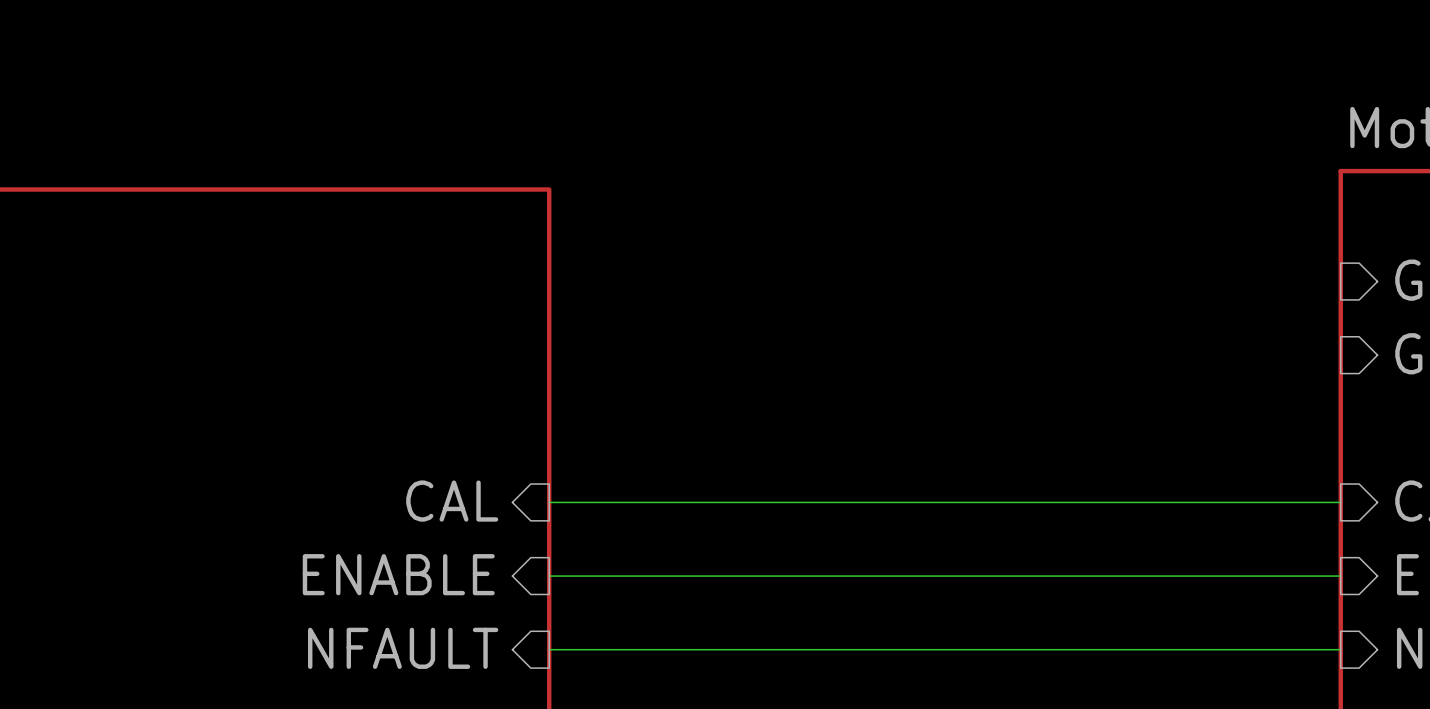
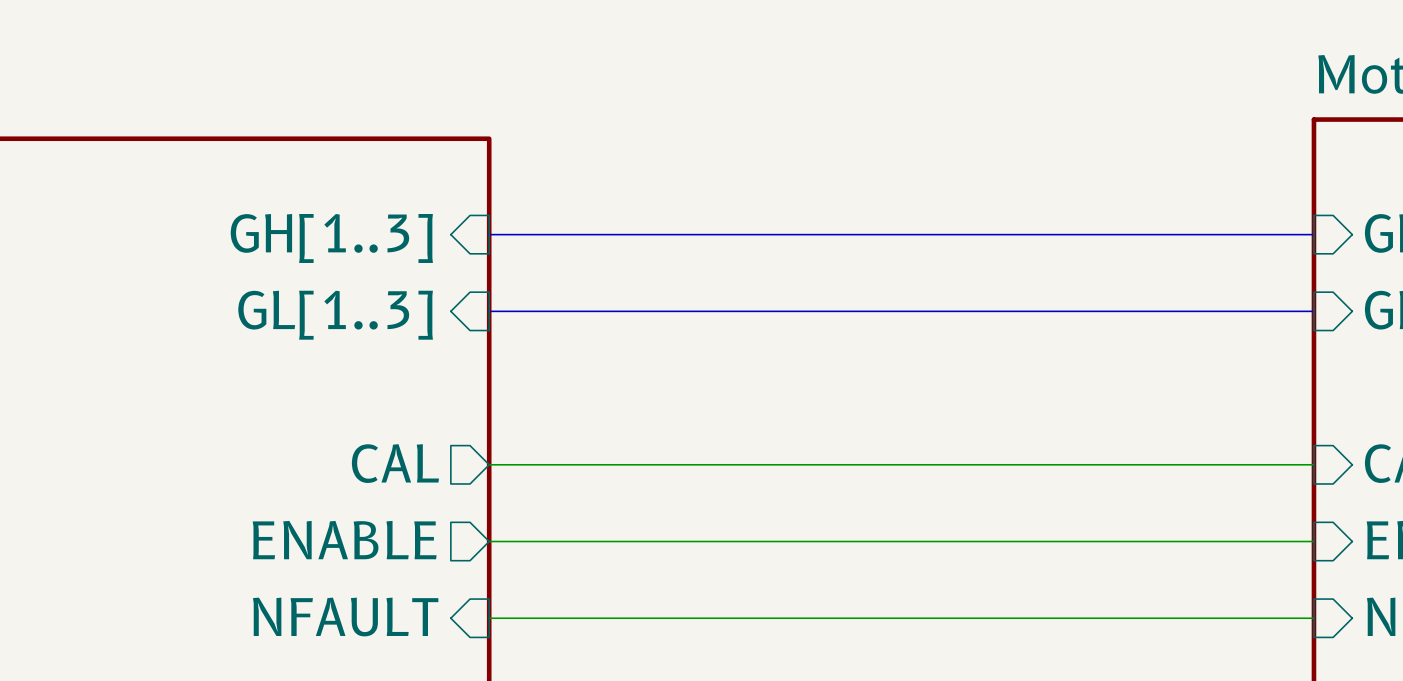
bus: none -> (489, 234) (1313, 234)
sheet pin: none -> GH[1..3] (331, 238)
bus: none -> (489, 311) (1313, 311)
sheet pin: none -> GL[1..3] (335, 315)
sheet pin shape: input (452, 501) -> output (395, 463)
sheet pin shape: input (398, 574) -> output (344, 540)

